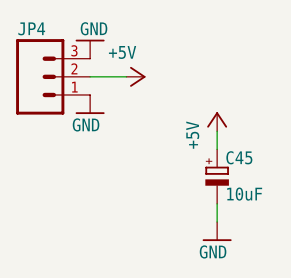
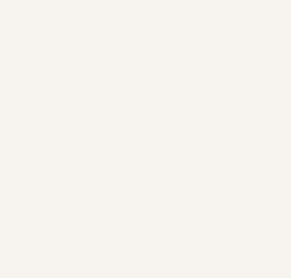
power symbol: GND (90, 49) -> none
JP4: (53, 76) -> none
wire: (90, 76) (126, 76) -> none
power symbol: +5V (135, 76) -> none
power symbol: GND (90, 104) -> none
power symbol: +5V (217, 121) -> none
wire: (217, 131) (217, 149) -> none
C45: 10uF (217, 176) -> none
wire: (217, 203) (217, 222) -> none
power symbol: GND (217, 231) -> none

